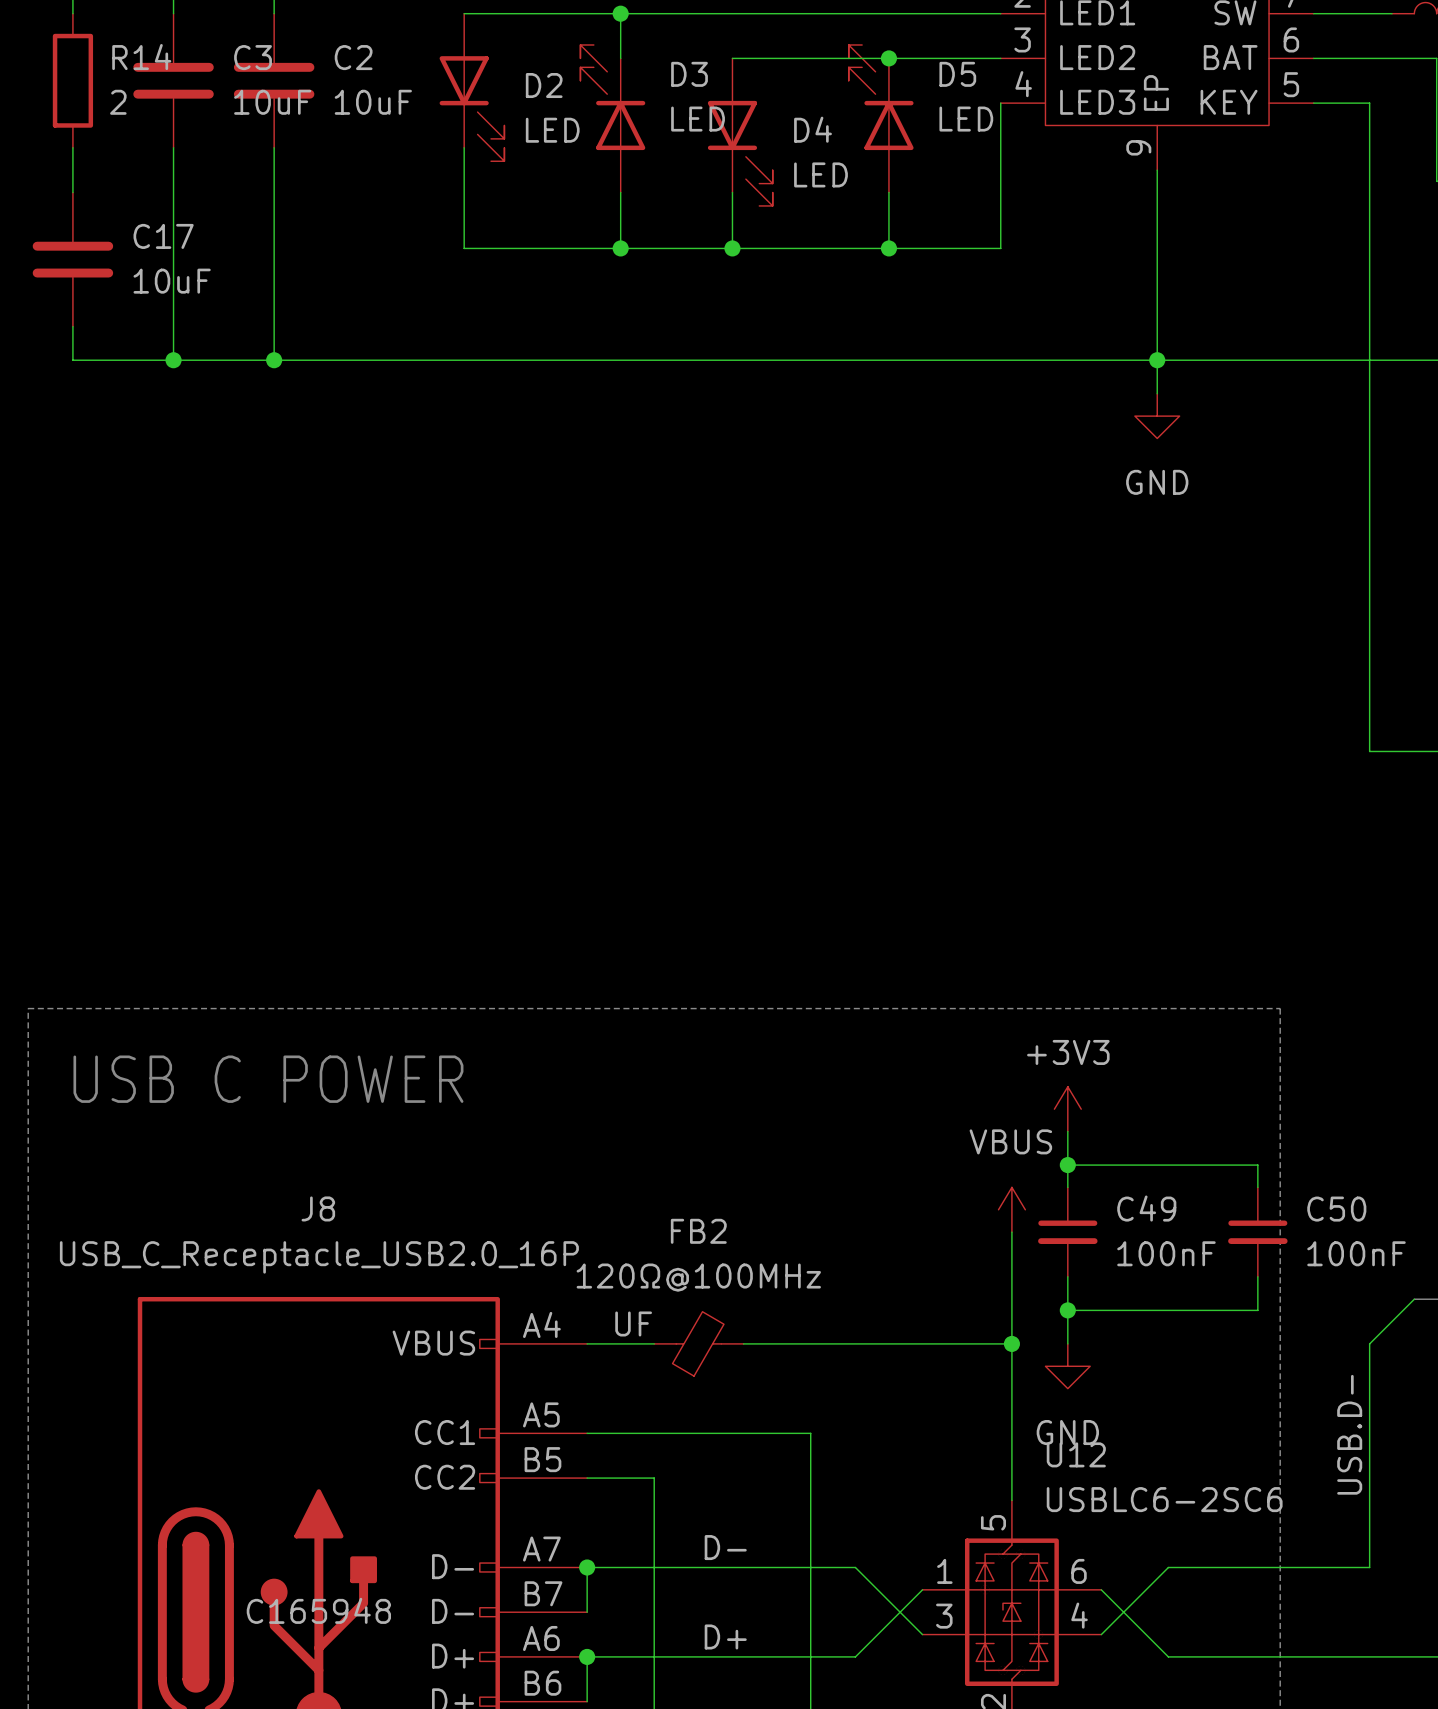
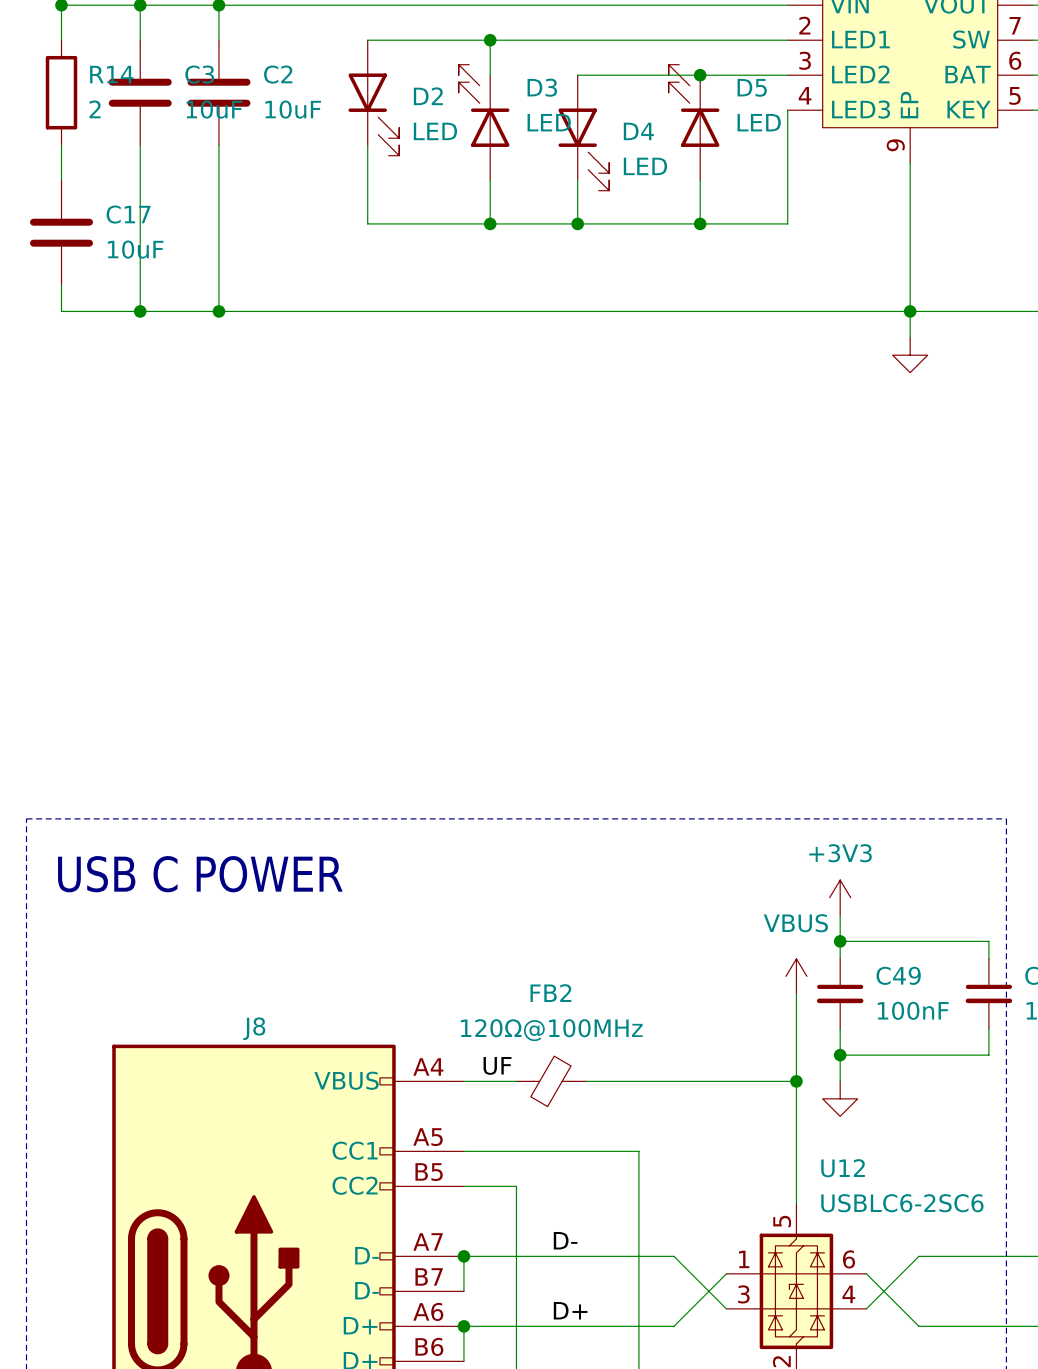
power symbol text: GND (1157, 482) -> none
J8 name position: J8 (318, 1208) -> J8 (254, 1028)
J8 value: USB_C_Receptacle_USB2.0_16P (319, 1257) -> none
power symbol text: GND (1067, 1432) -> none
J8 text: C165948 (318, 1610) -> none

